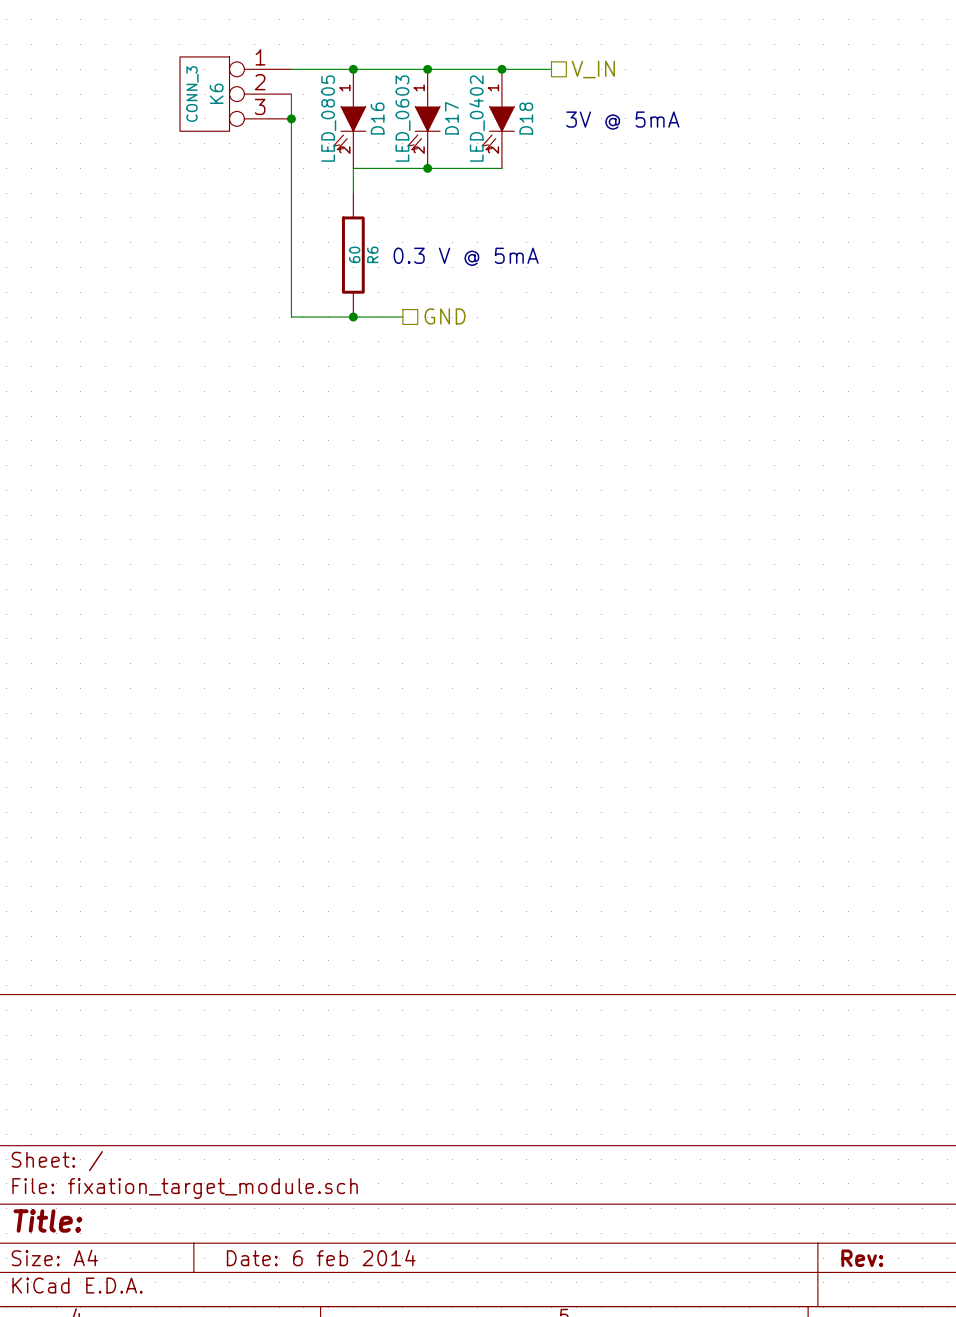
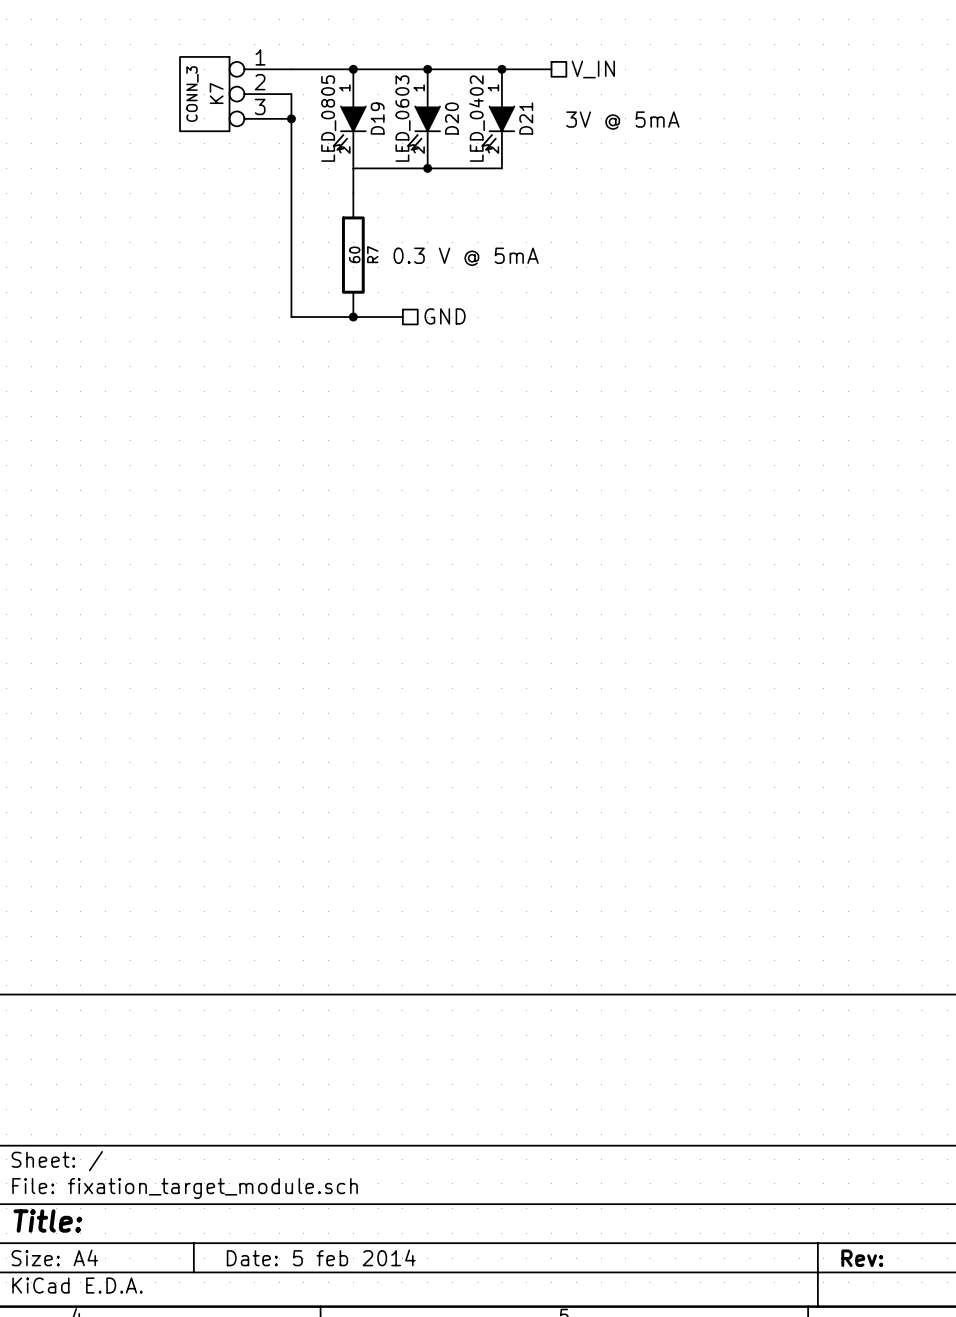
K6 name: K6 (216, 93) -> K7 (216, 93)
D16 name: D16 (377, 118) -> D19 (377, 118)
D17 name: D17 (451, 118) -> D20 (451, 118)
D18 name: D18 (526, 118) -> D21 (526, 118)
R6 name: R6 (372, 254) -> R7 (372, 254)
title block: Date: 6 feb 2014 (321, 1257) -> Date: 5 feb 2014 (321, 1257)

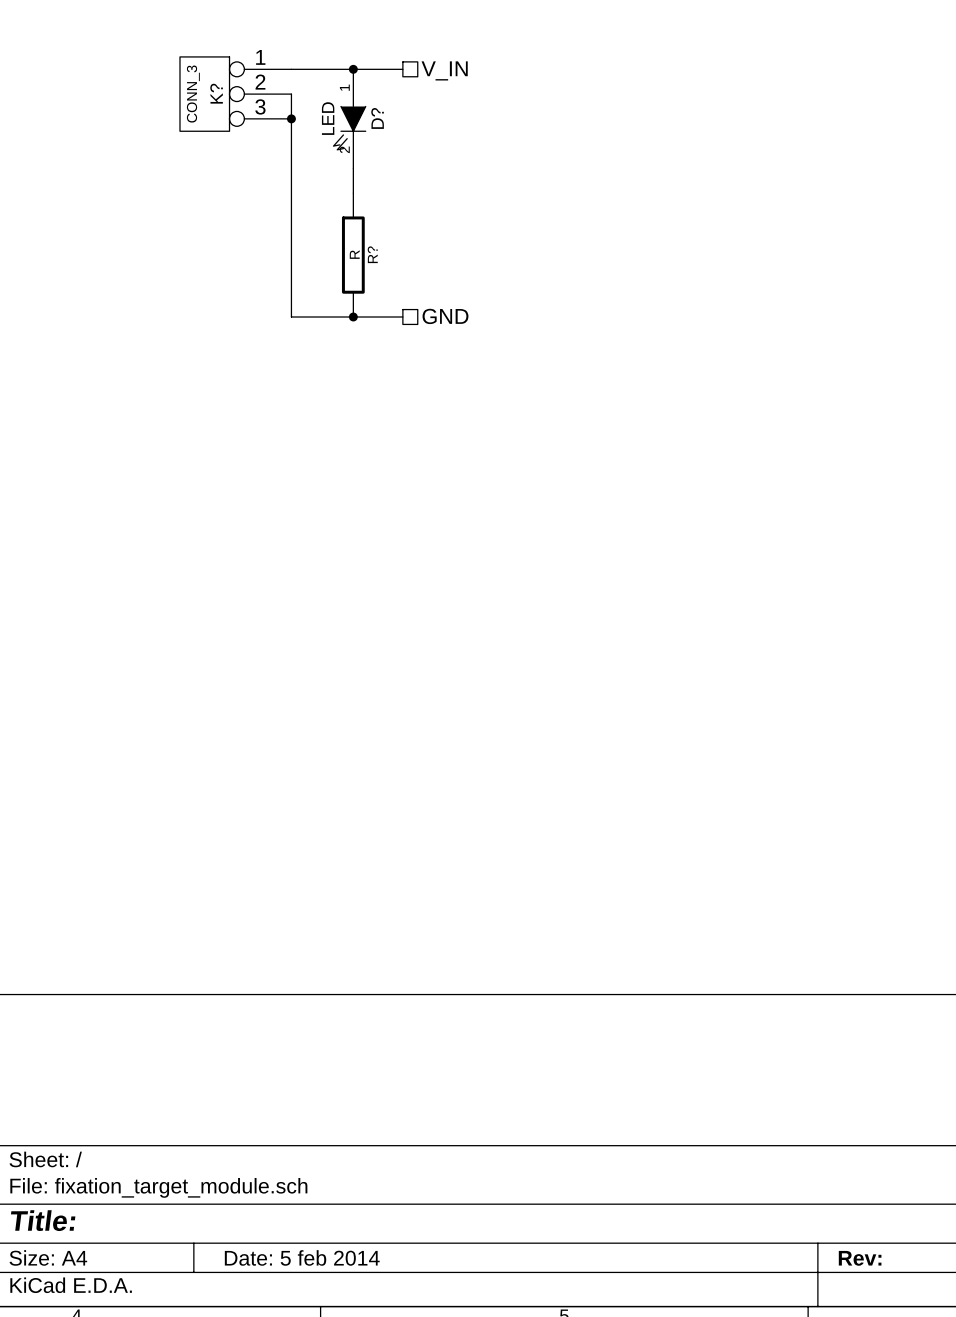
wire: (402, 69) (551, 69) -> none
junction: (427, 69) -> none
junction: (501, 69) -> none
hierarchical label position: V_IN (593, 69) -> V_IN (444, 70)
K7 name: K7 (216, 93) -> K? (216, 93)
D19 value: LED_0805 (328, 118) -> LED (328, 118)
D19 name: D19 (377, 118) -> D? (377, 118)
D20: LED_0603 (423, 118) -> none
D21: LED_0402 (498, 118) -> none
text: 3V @ 5mA (622, 120) -> none
wire: (353, 168) (501, 168) -> none
junction: (427, 168) -> none
R7 value: 60 (354, 254) -> R (354, 254)
R7 name: R7 (372, 254) -> R? (372, 254)
text: 0.3 V @ 5mA (466, 256) -> none

